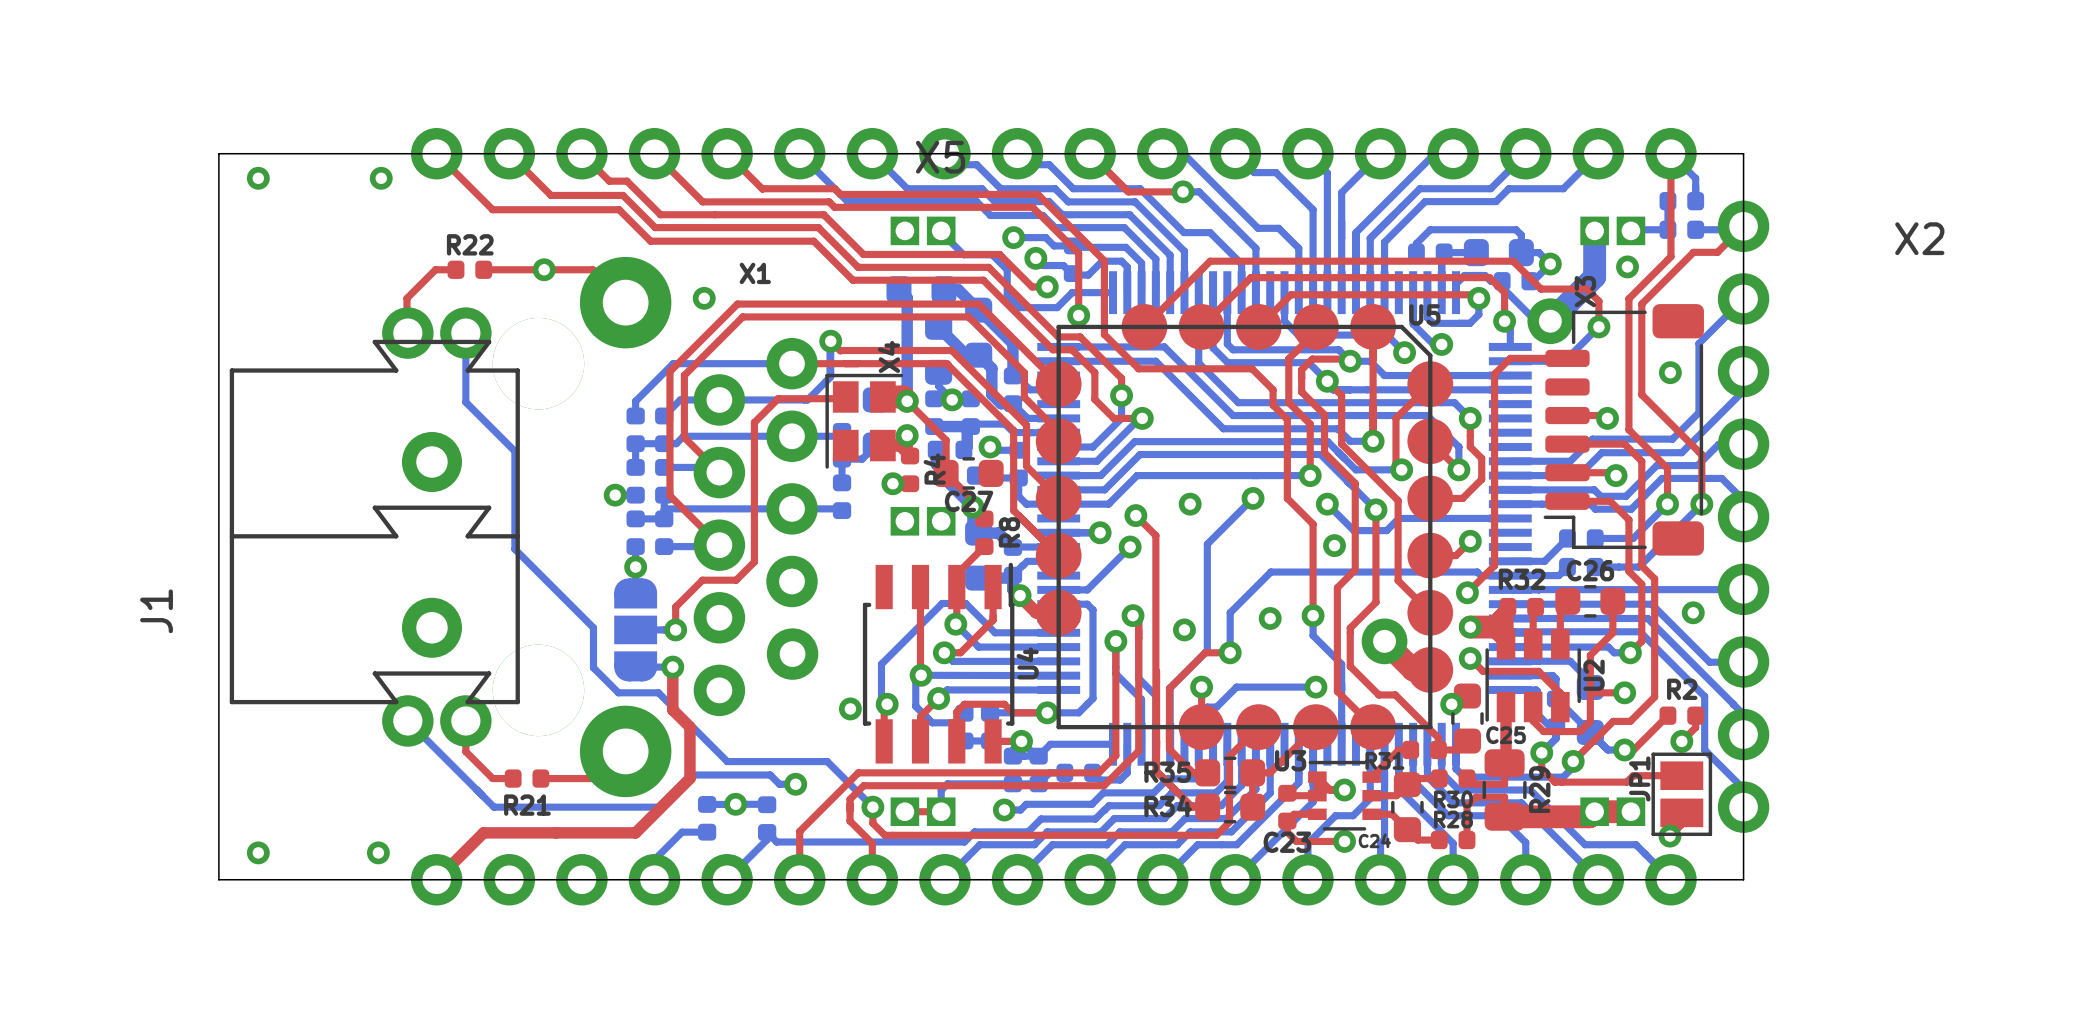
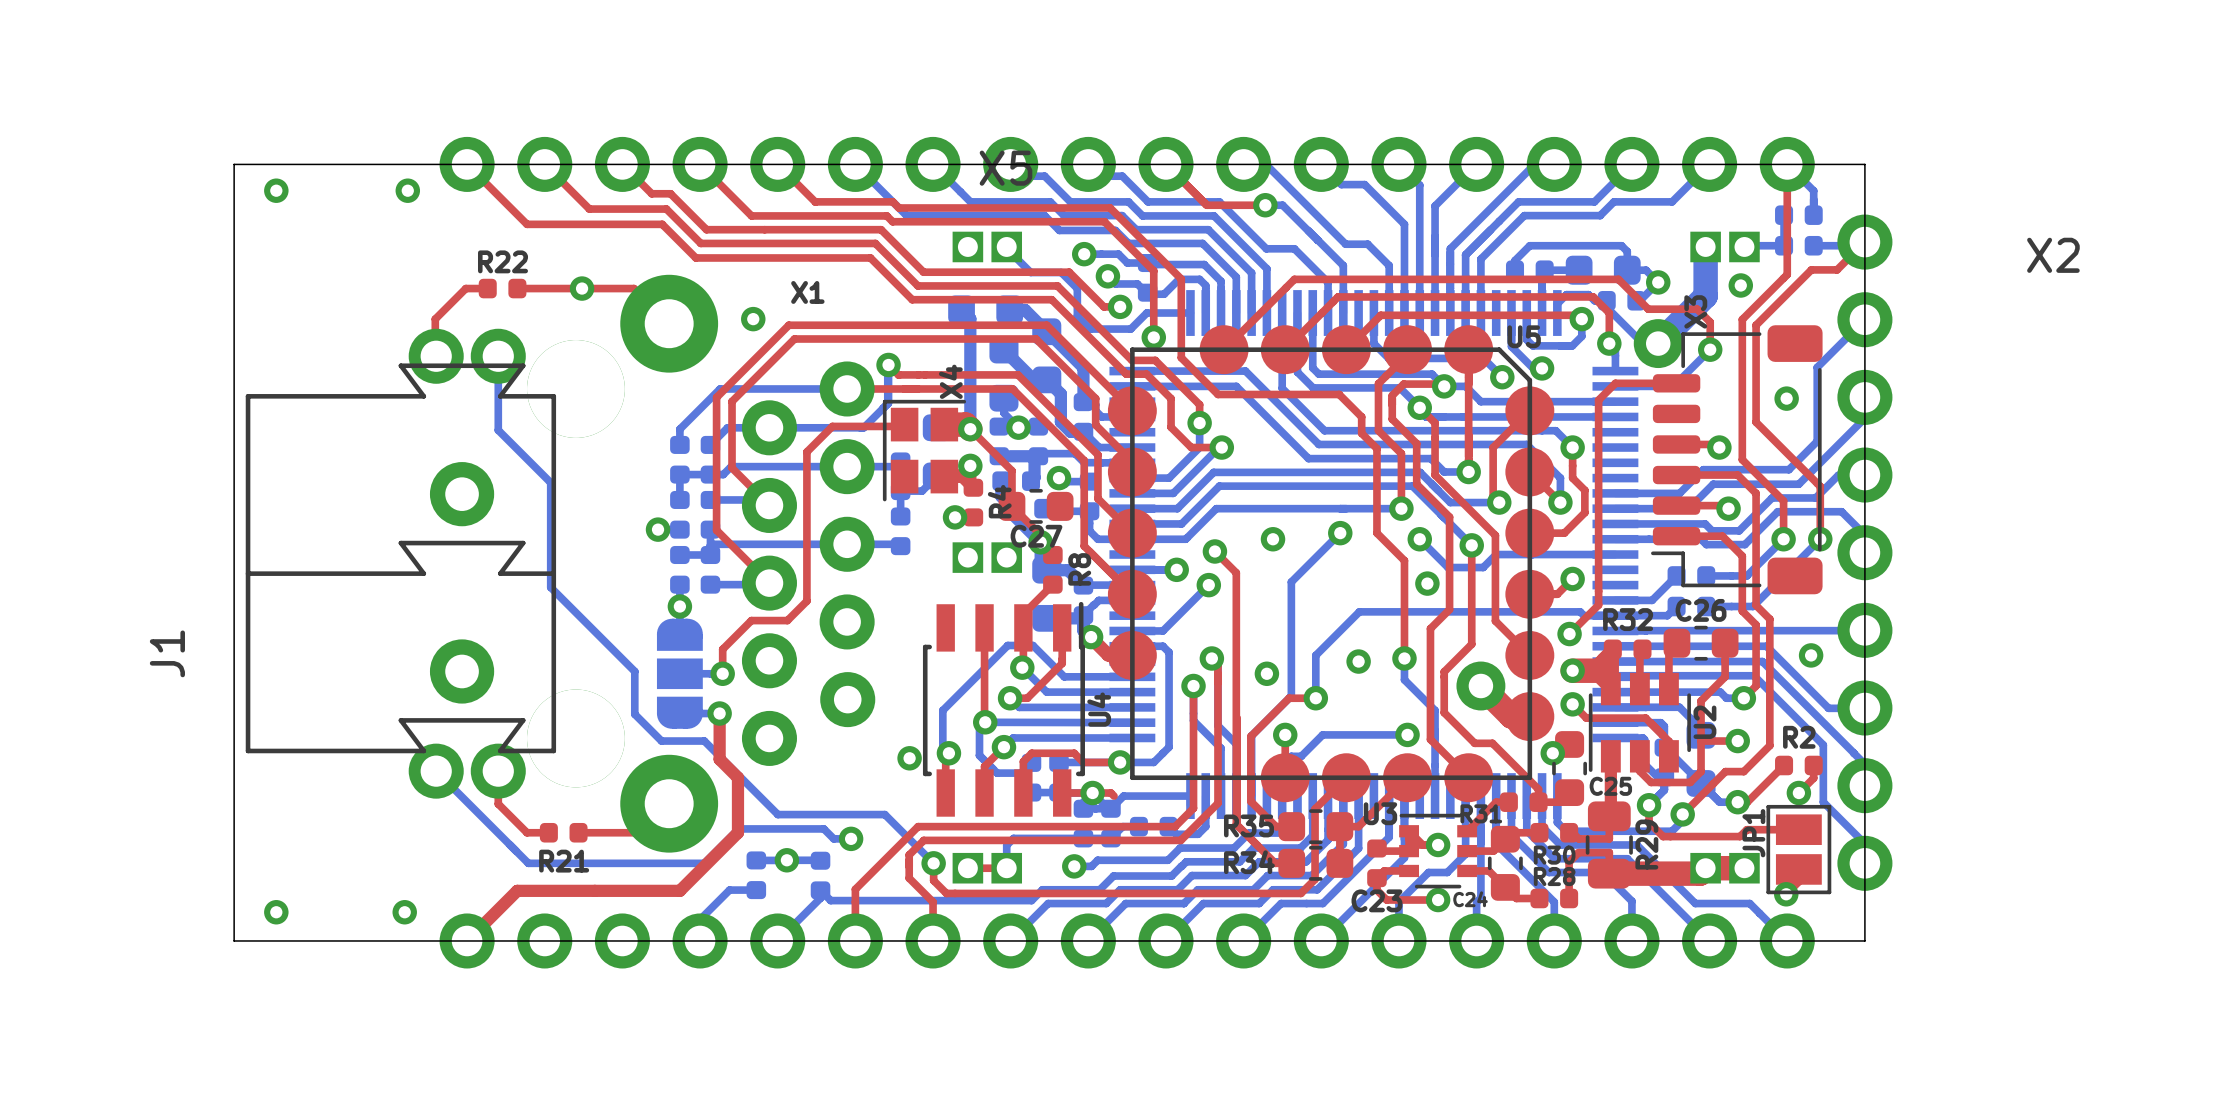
top track: none -> (1092, 793) (1110, 793) (1114, 796)

